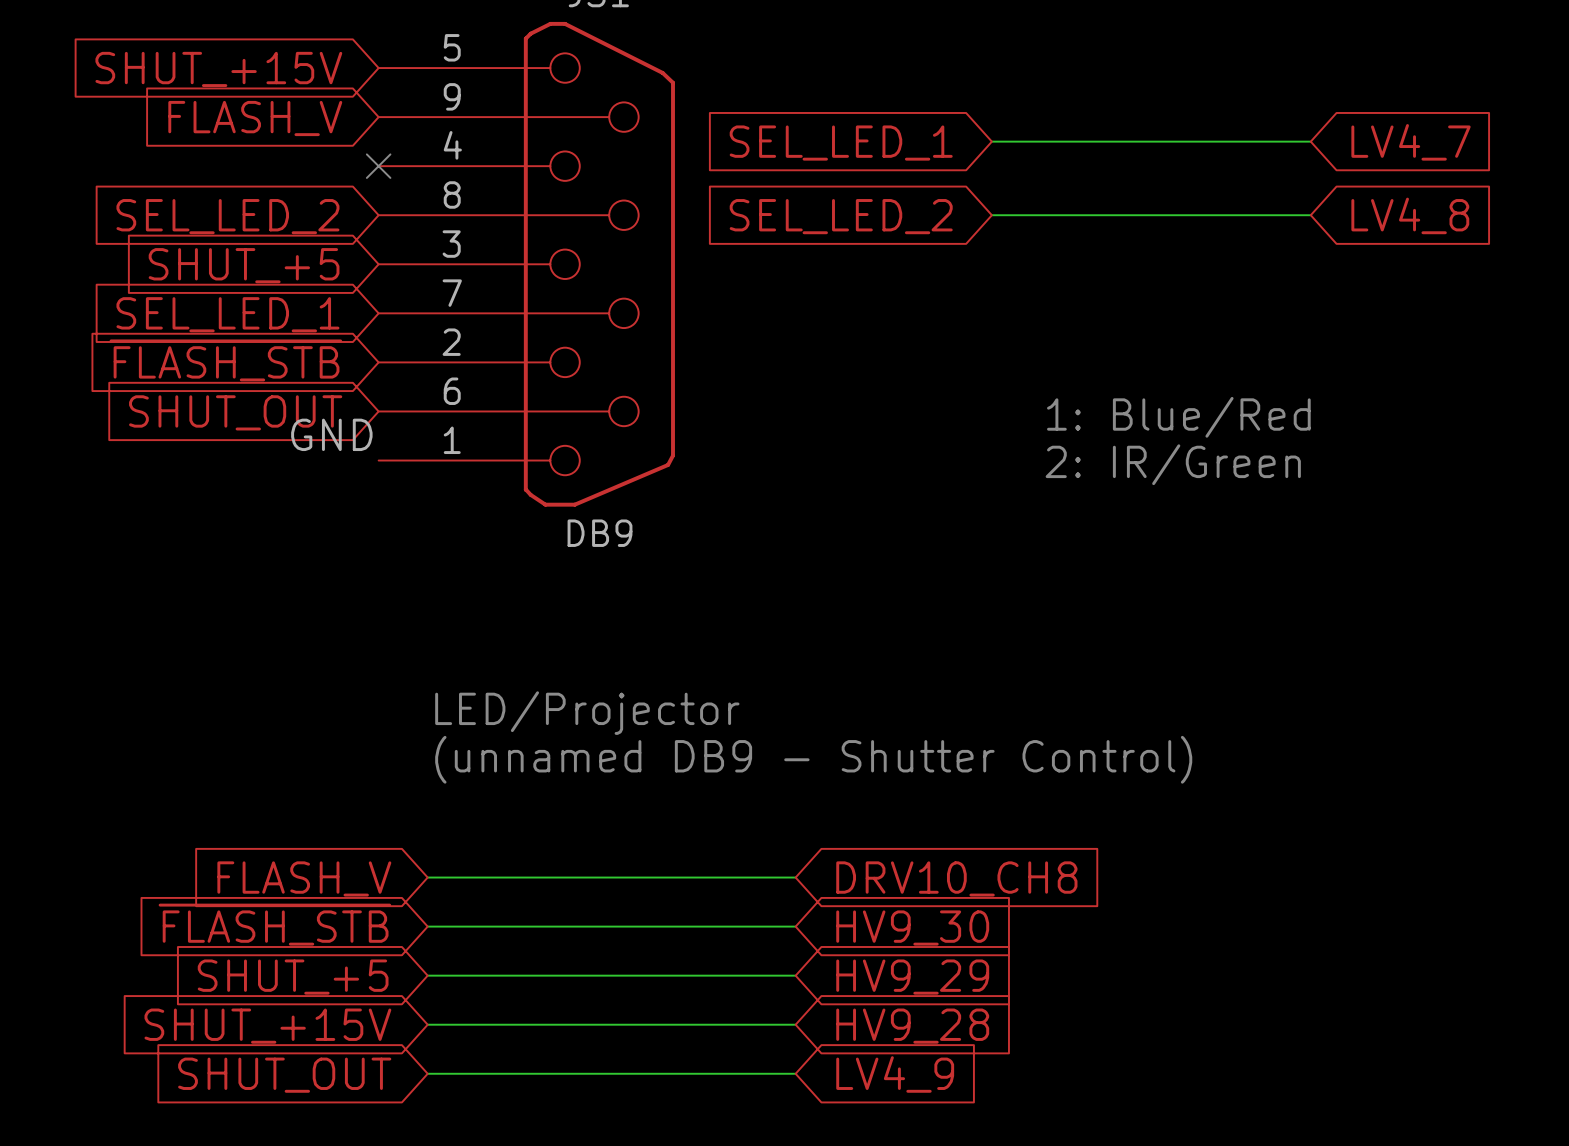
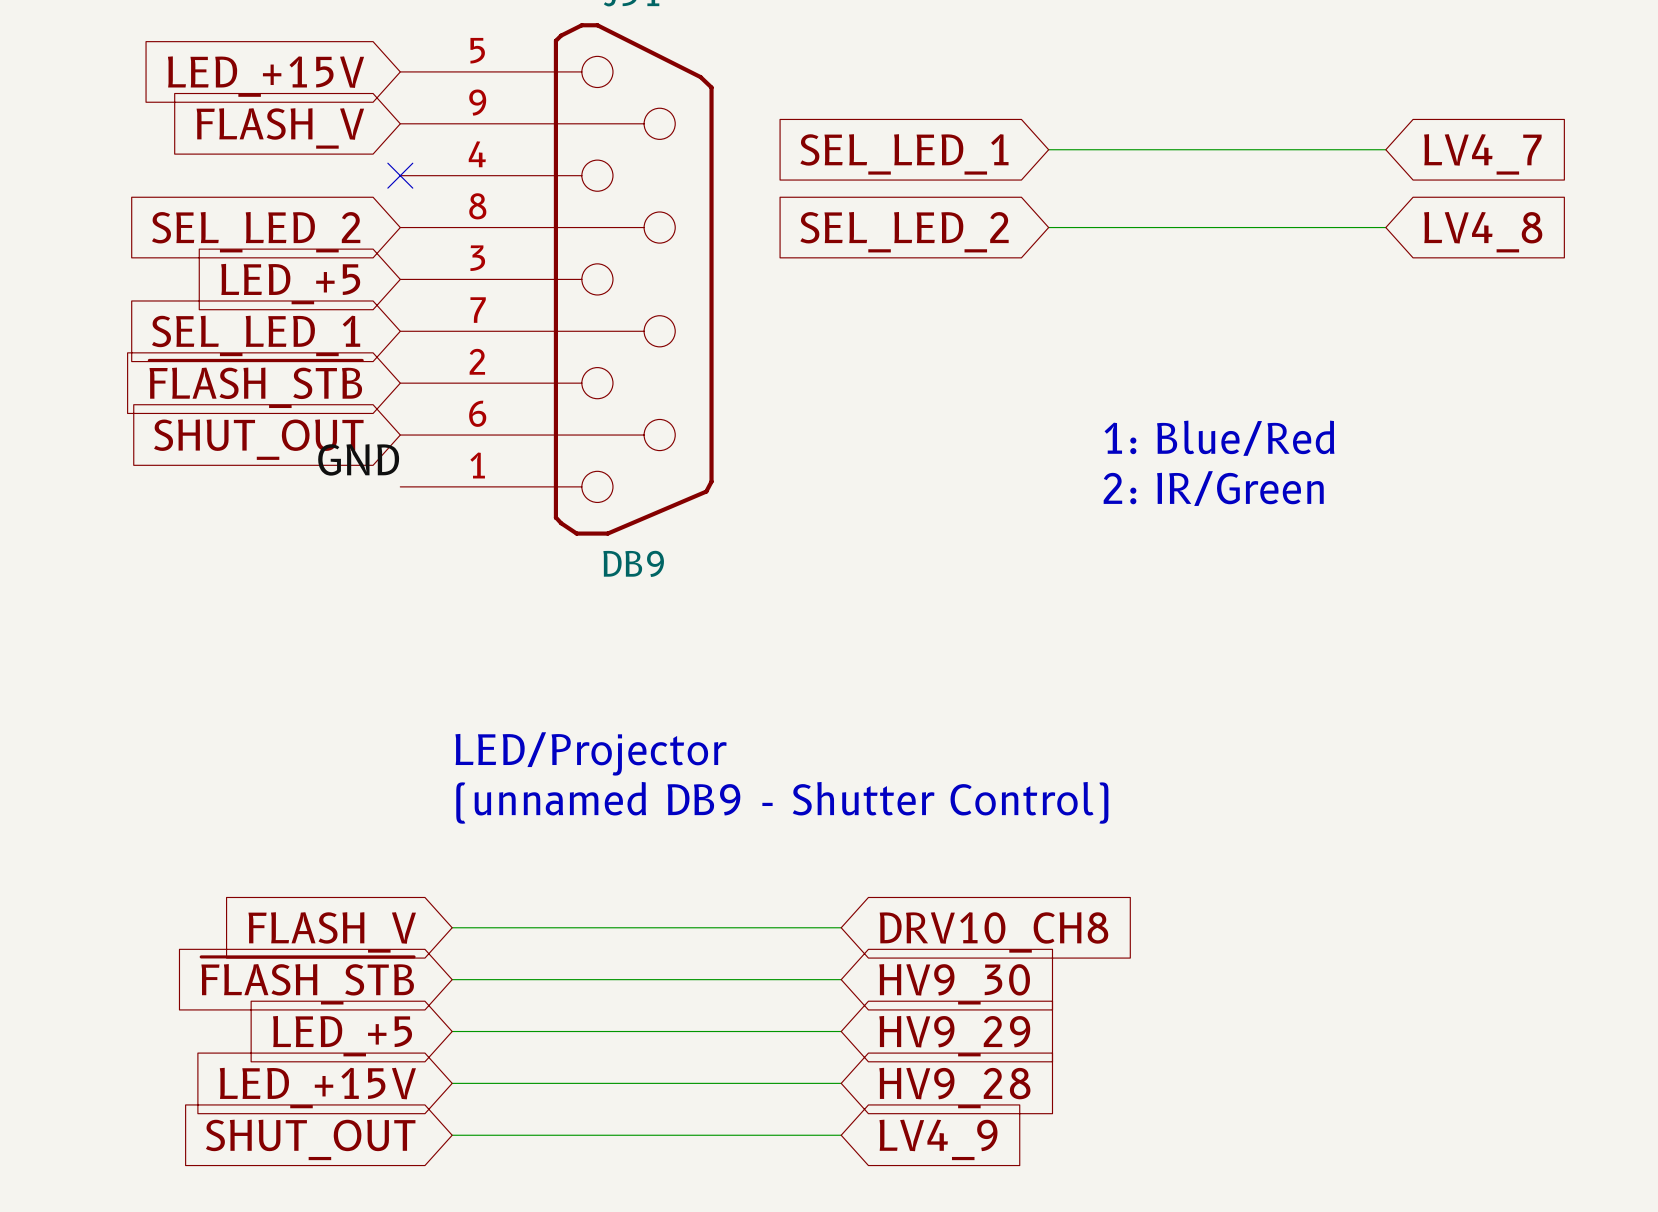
global label: SHUT_+15V (218, 69) -> LED_+15V (266, 76)
global label: SHUT_+5 (244, 265) -> LED_+5 (290, 284)
global label: SHUT_+5 (293, 977) -> LED_+5 (342, 1036)
global label: SHUT_+15V (267, 1026) -> LED_+15V (317, 1088)

